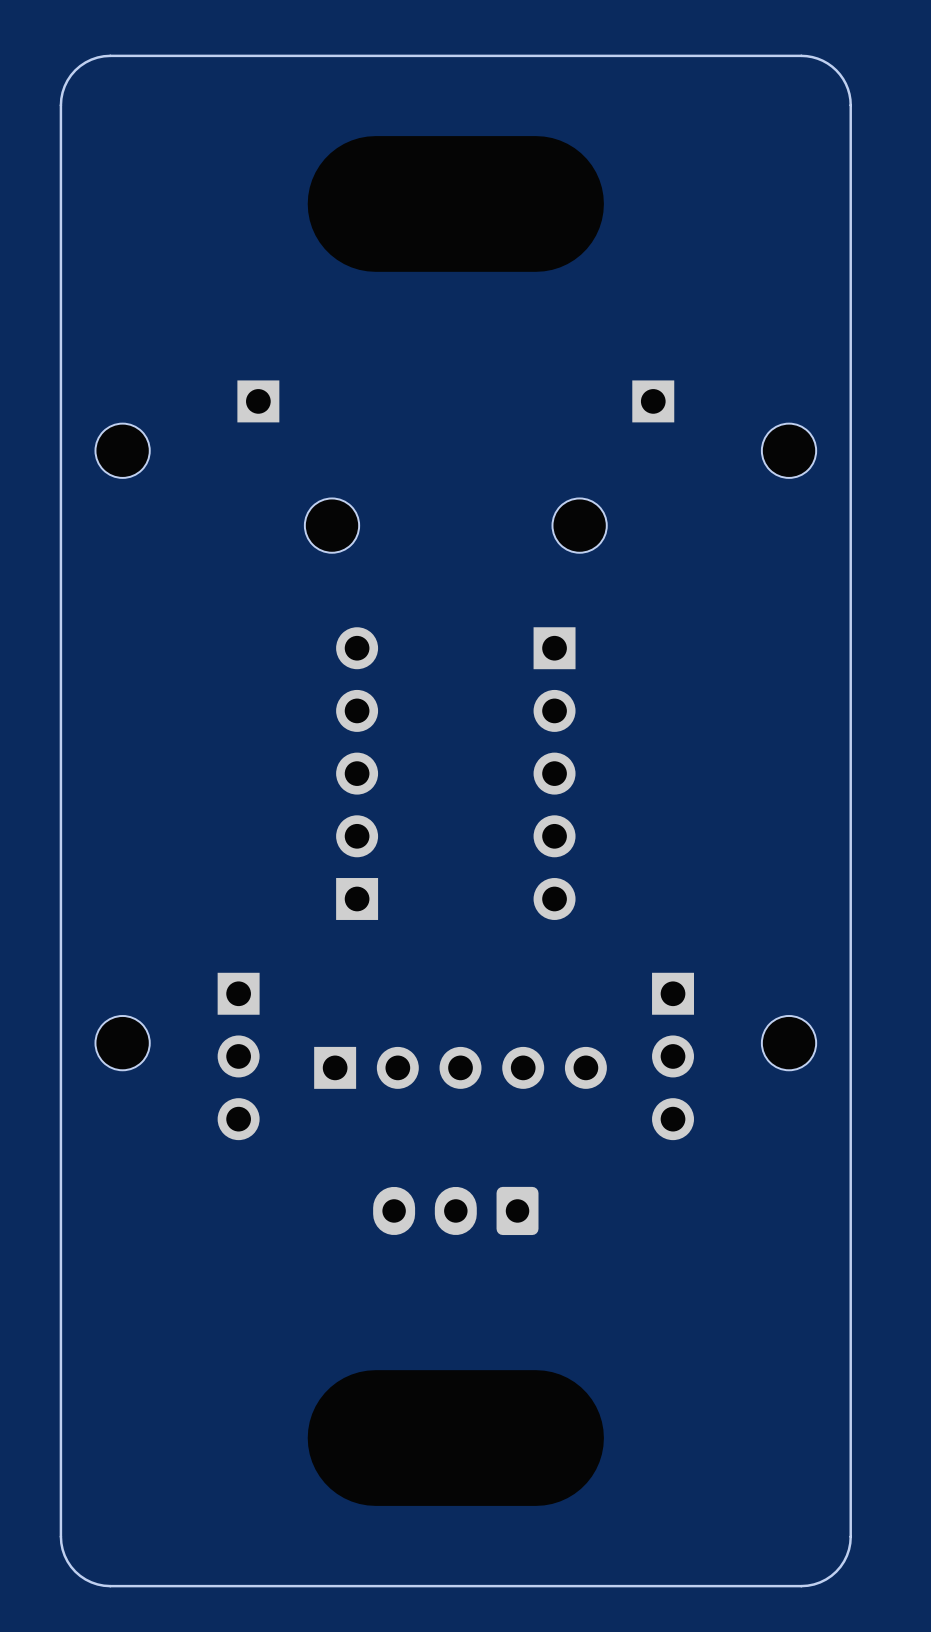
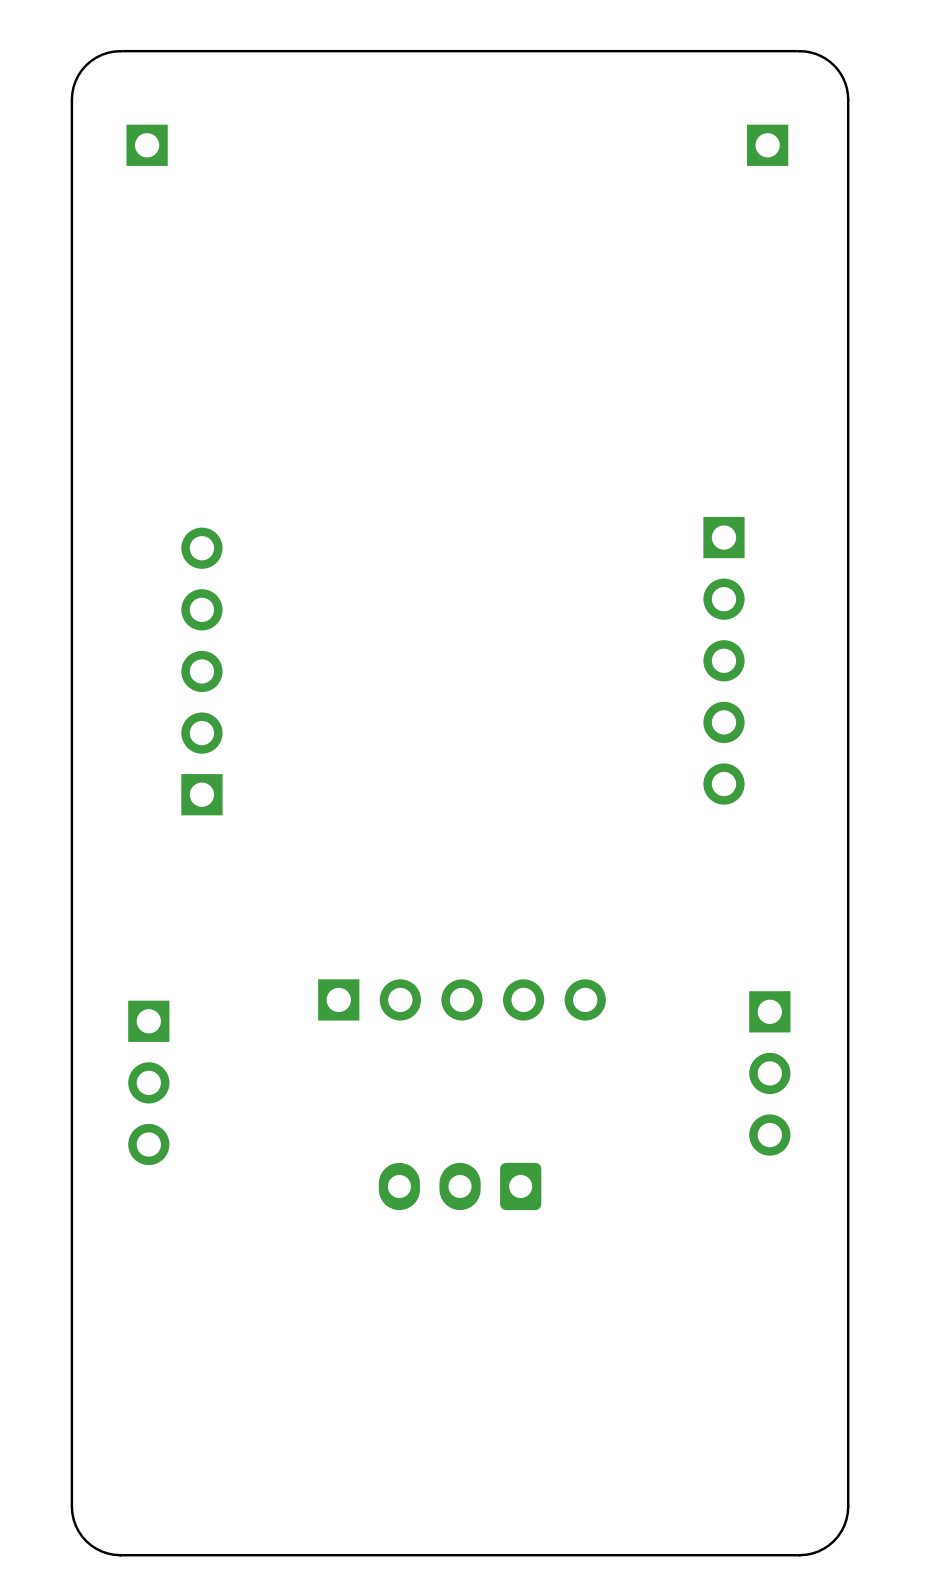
part position: (258, 401) -> (147, 145)
part position: (653, 401) -> (767, 145)
part: (122, 450) -> none
part: (789, 450) -> none
part: (332, 525) -> none
part: (579, 525) -> none
part: none -> (723, 660)
part: none -> (201, 671)
part: (357, 773) -> none
part: (554, 773) -> none
part: (122, 1043) -> none
part: (789, 1043) -> none
part position: (238, 1056) -> (148, 1082)
part position: (673, 1056) -> (769, 1073)
part position: (460, 1067) -> (461, 999)

